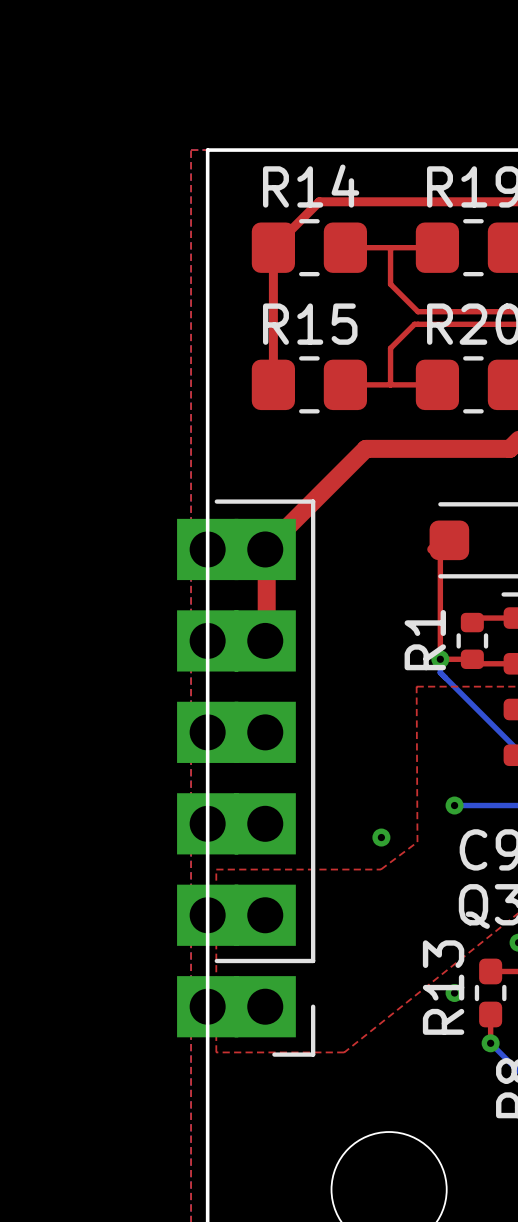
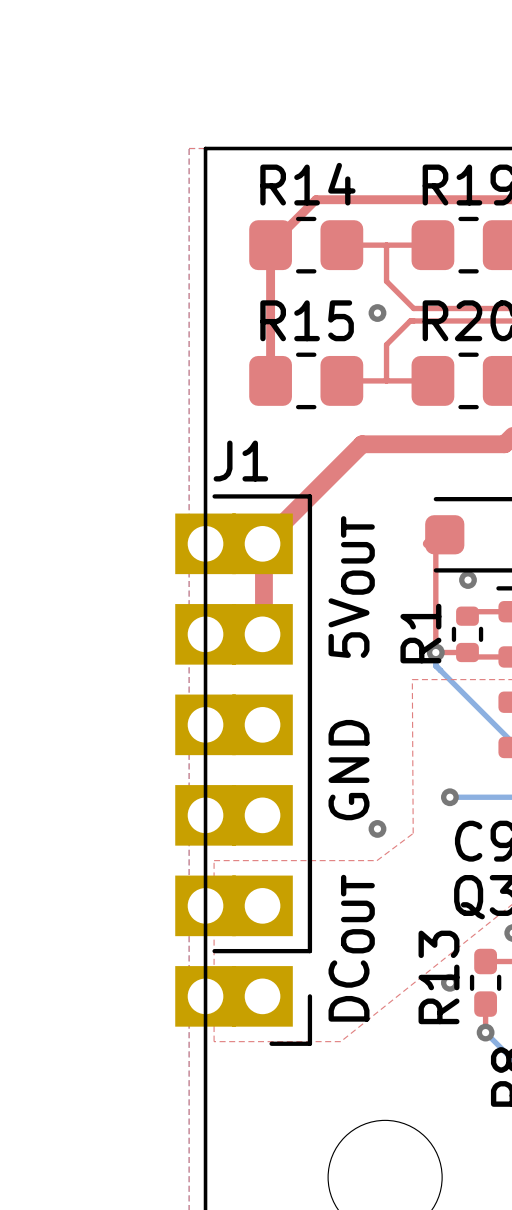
via: none -> (377, 313)
J1 name: none -> J1 (240, 461)
via: none -> (468, 580)
text: none -> 5VOUT (351, 587)
text: none -> GND (349, 770)
text: none -> DCOUT (351, 948)

